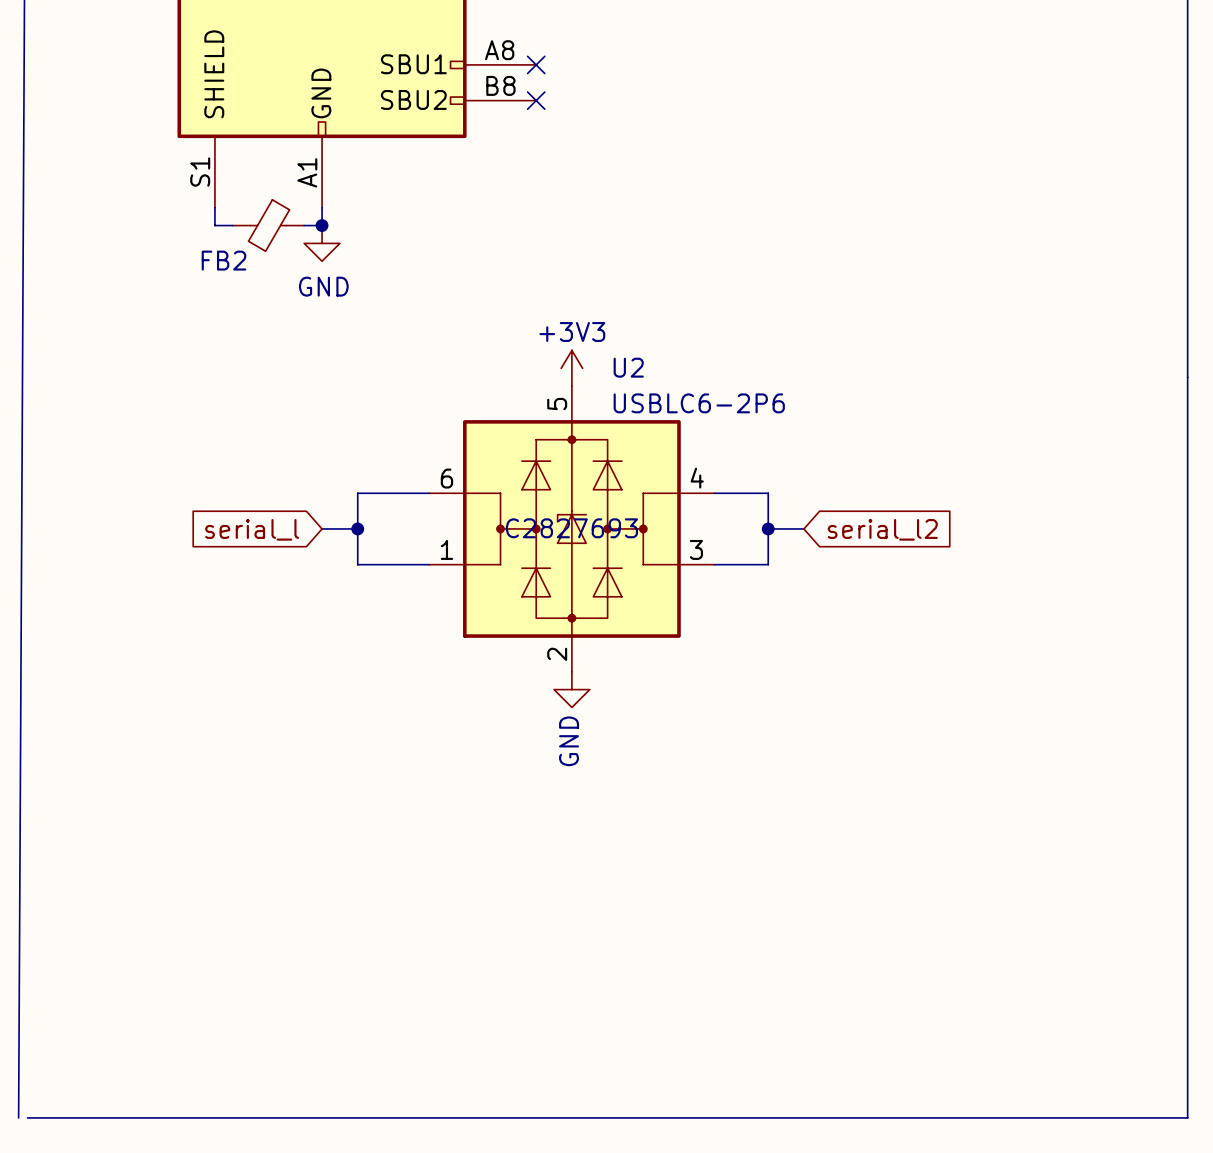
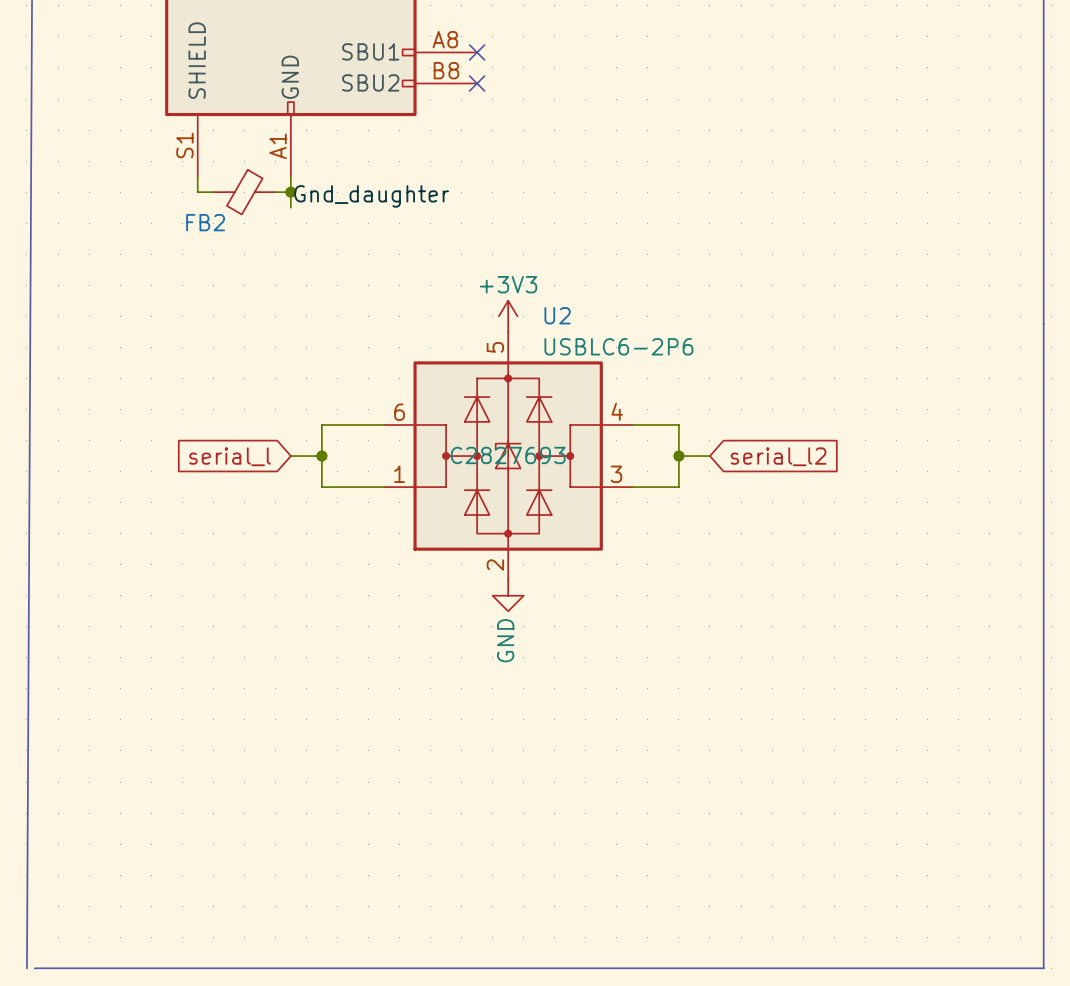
label: none -> Gnd_daughter (371, 196)
power symbol: GND (322, 243) -> none

